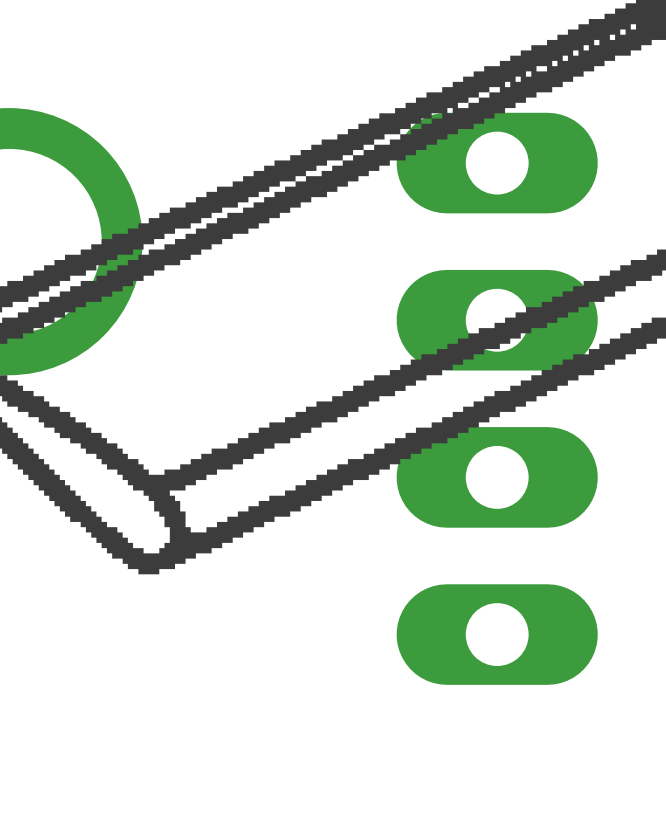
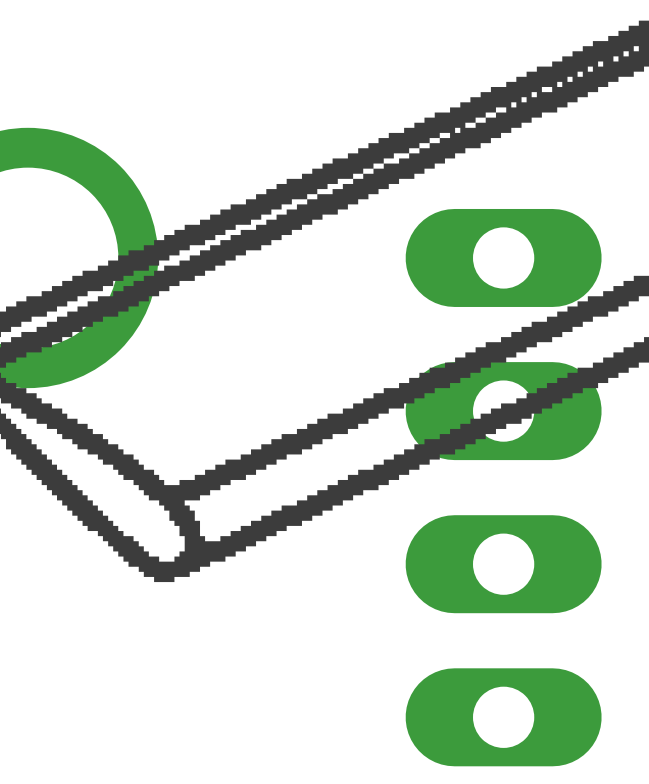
part position: (497, 398) -> (503, 487)

